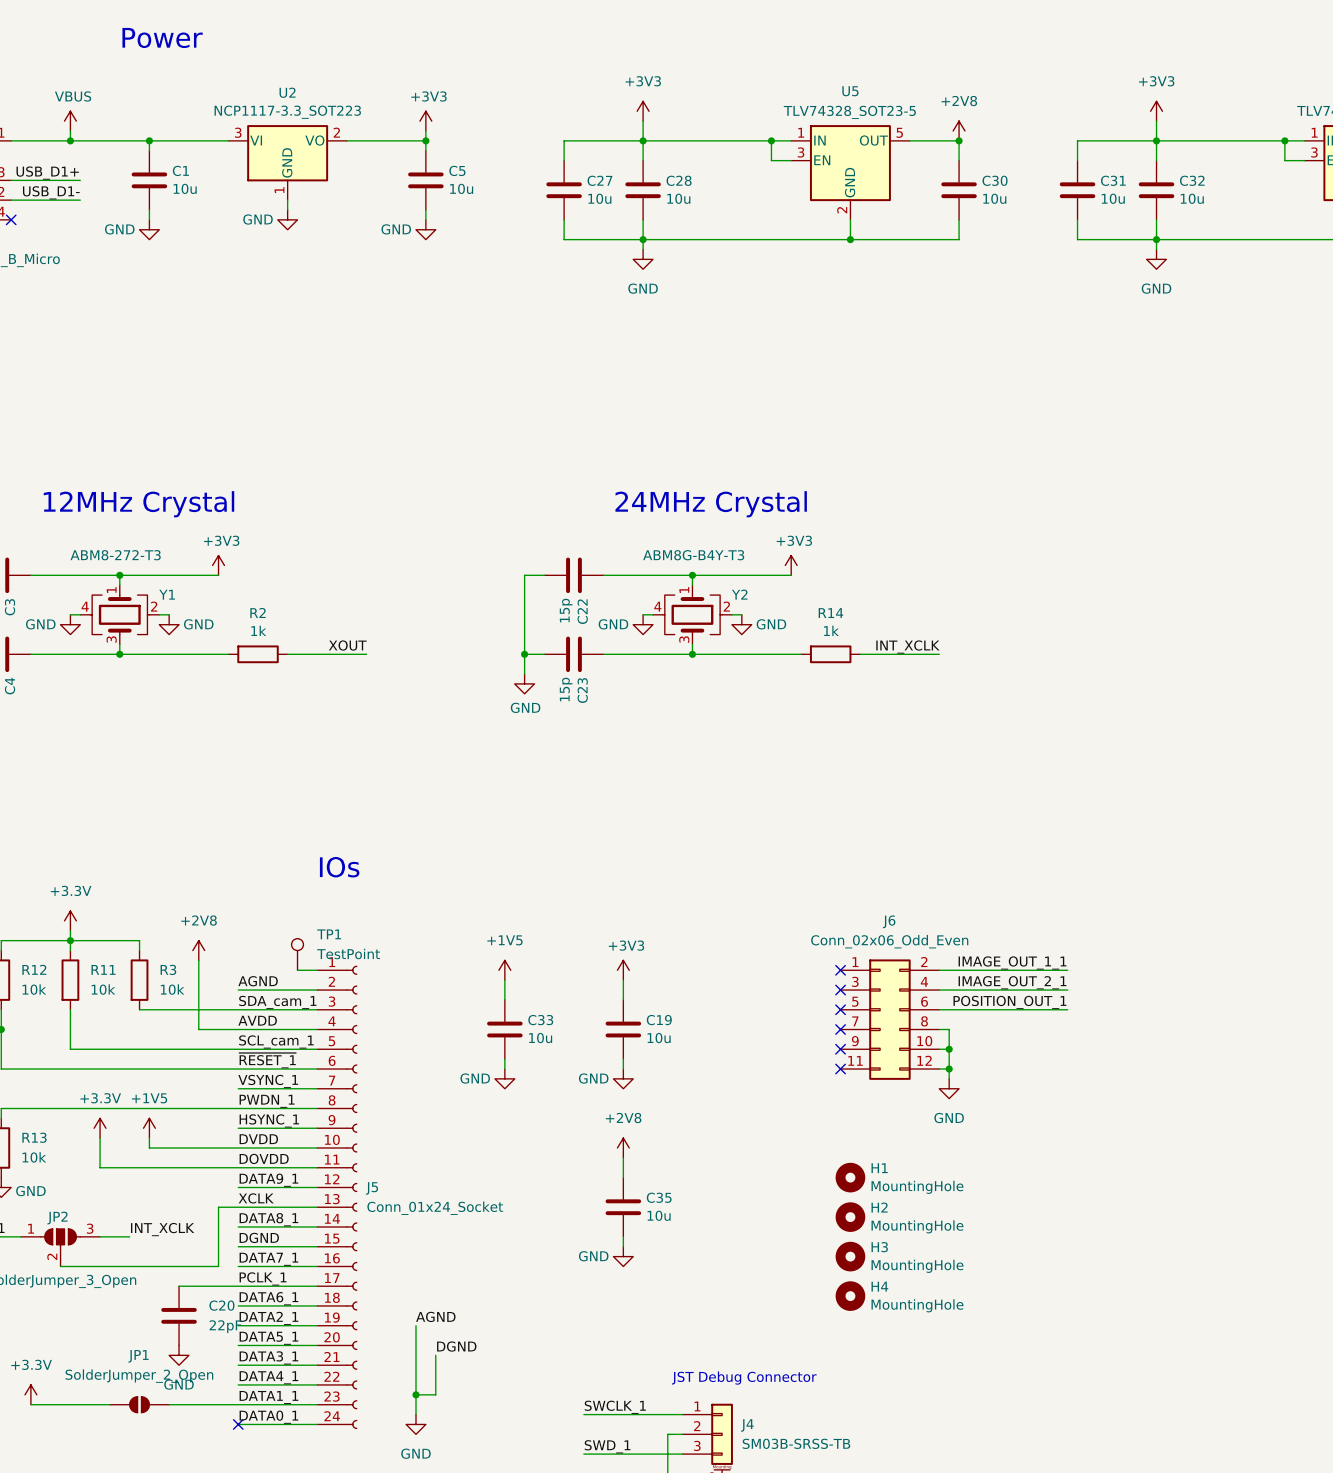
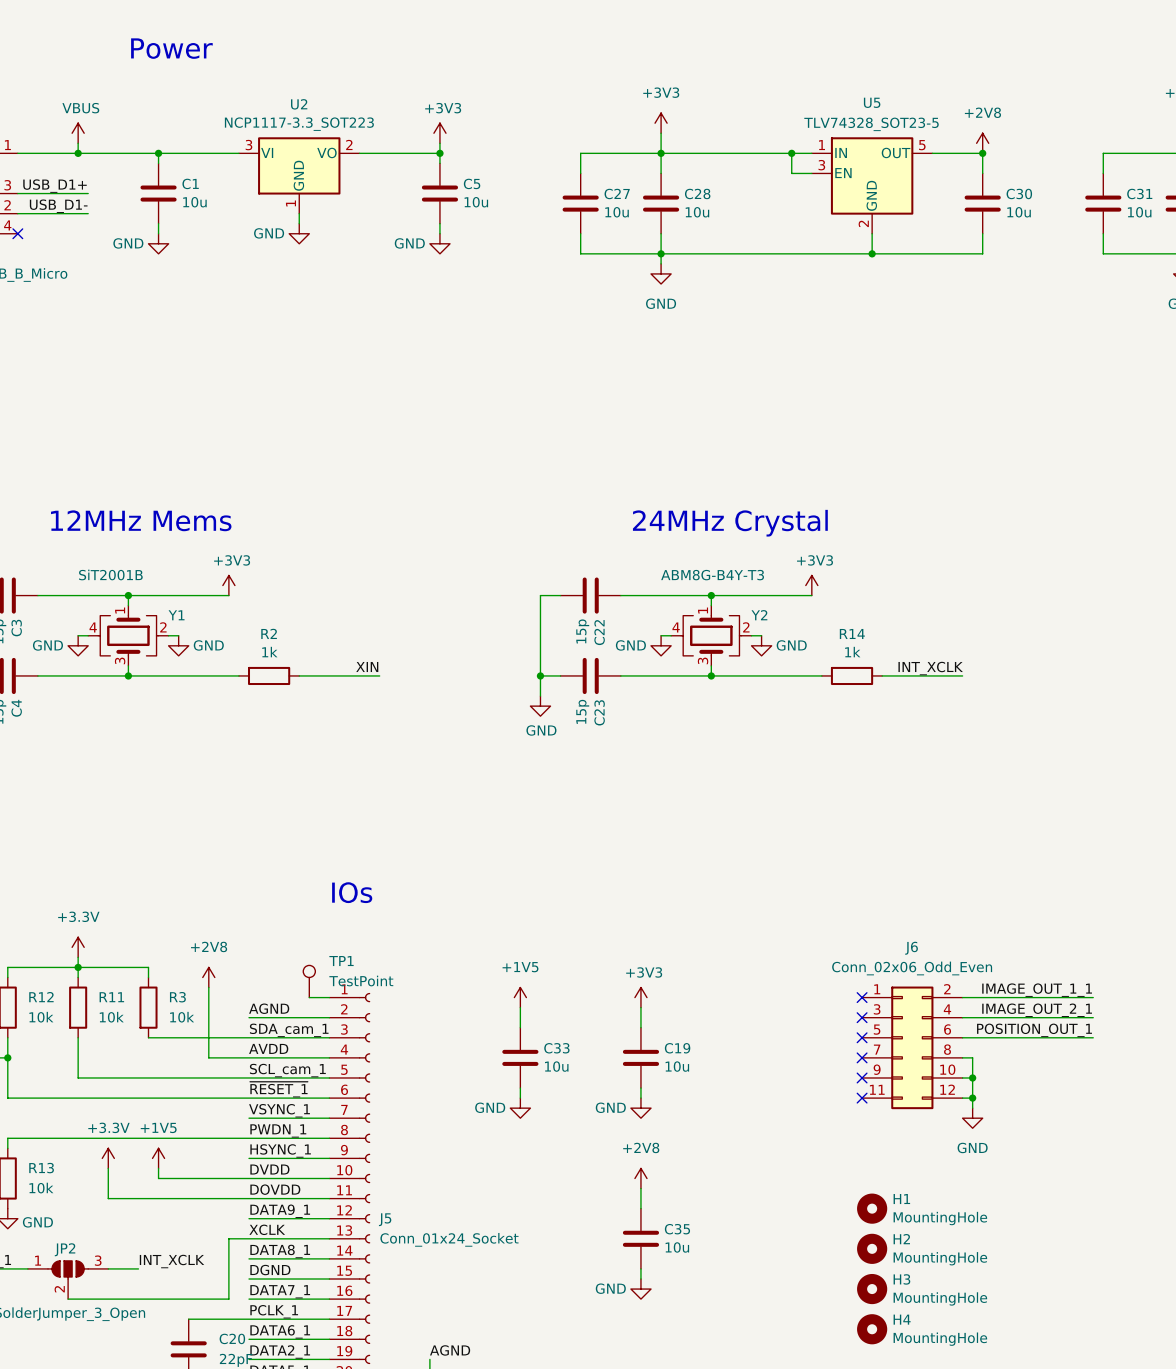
text: 12MHz Crystal (139, 504) -> 12MHz Mems (141, 520)
Y1 value: ABM8-272-T3 (115, 555) -> SiT2001B (110, 574)
label: XOUT (347, 645) -> XIN (367, 667)

